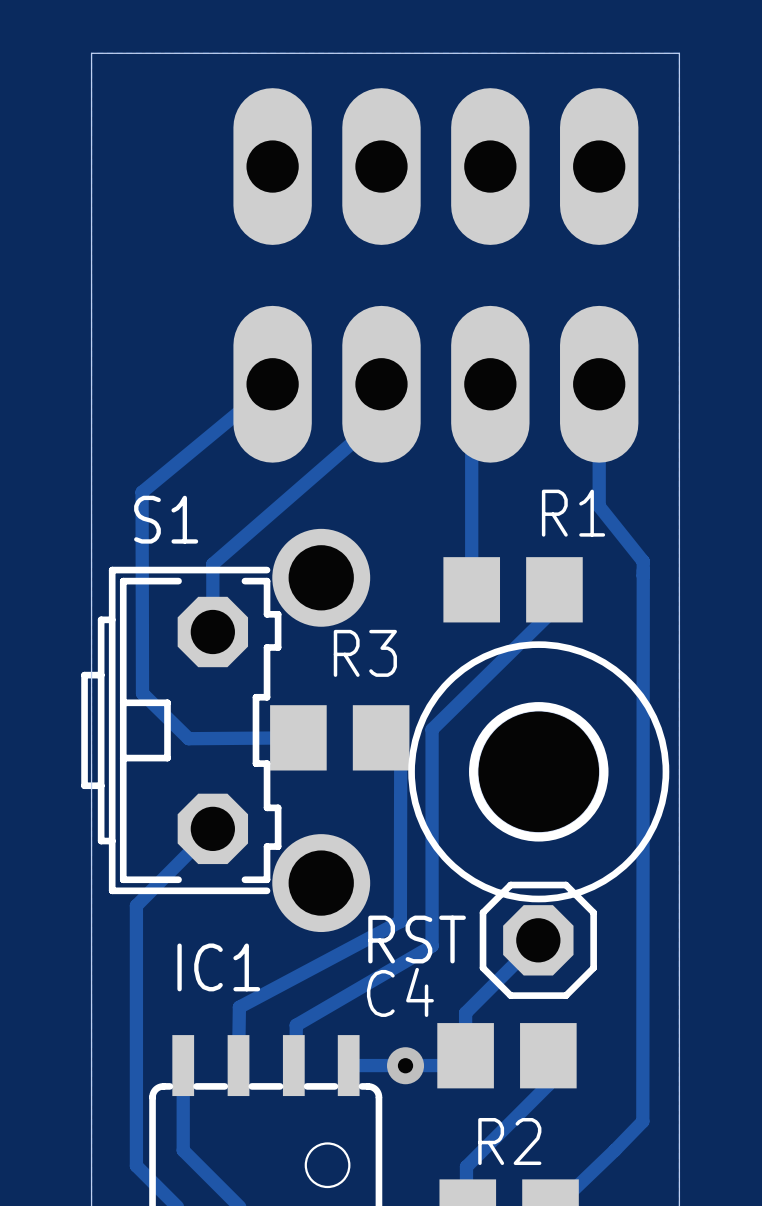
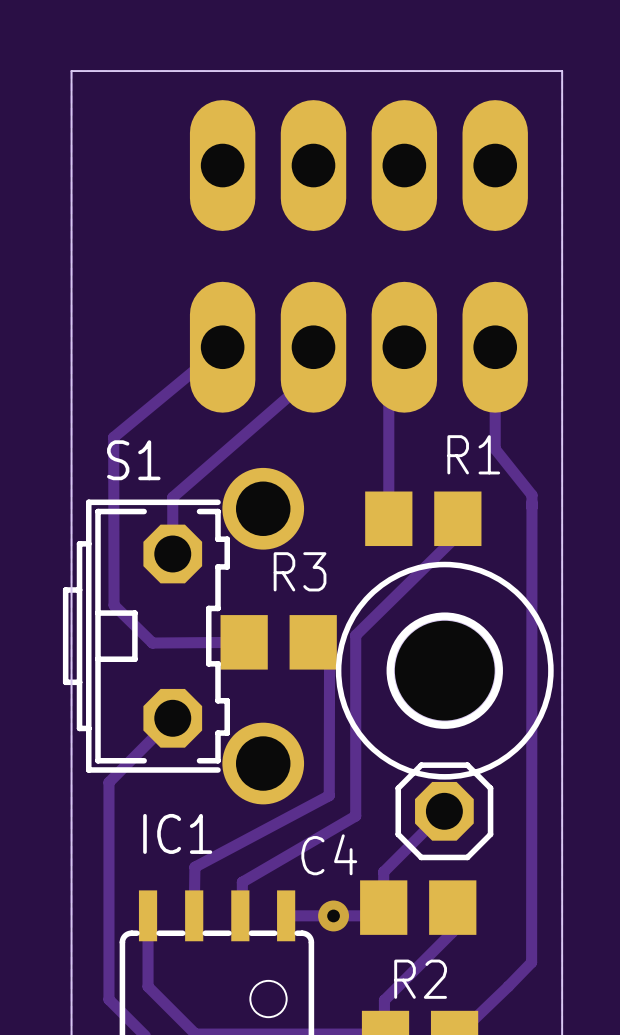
RST name: RST (417, 939) -> none

